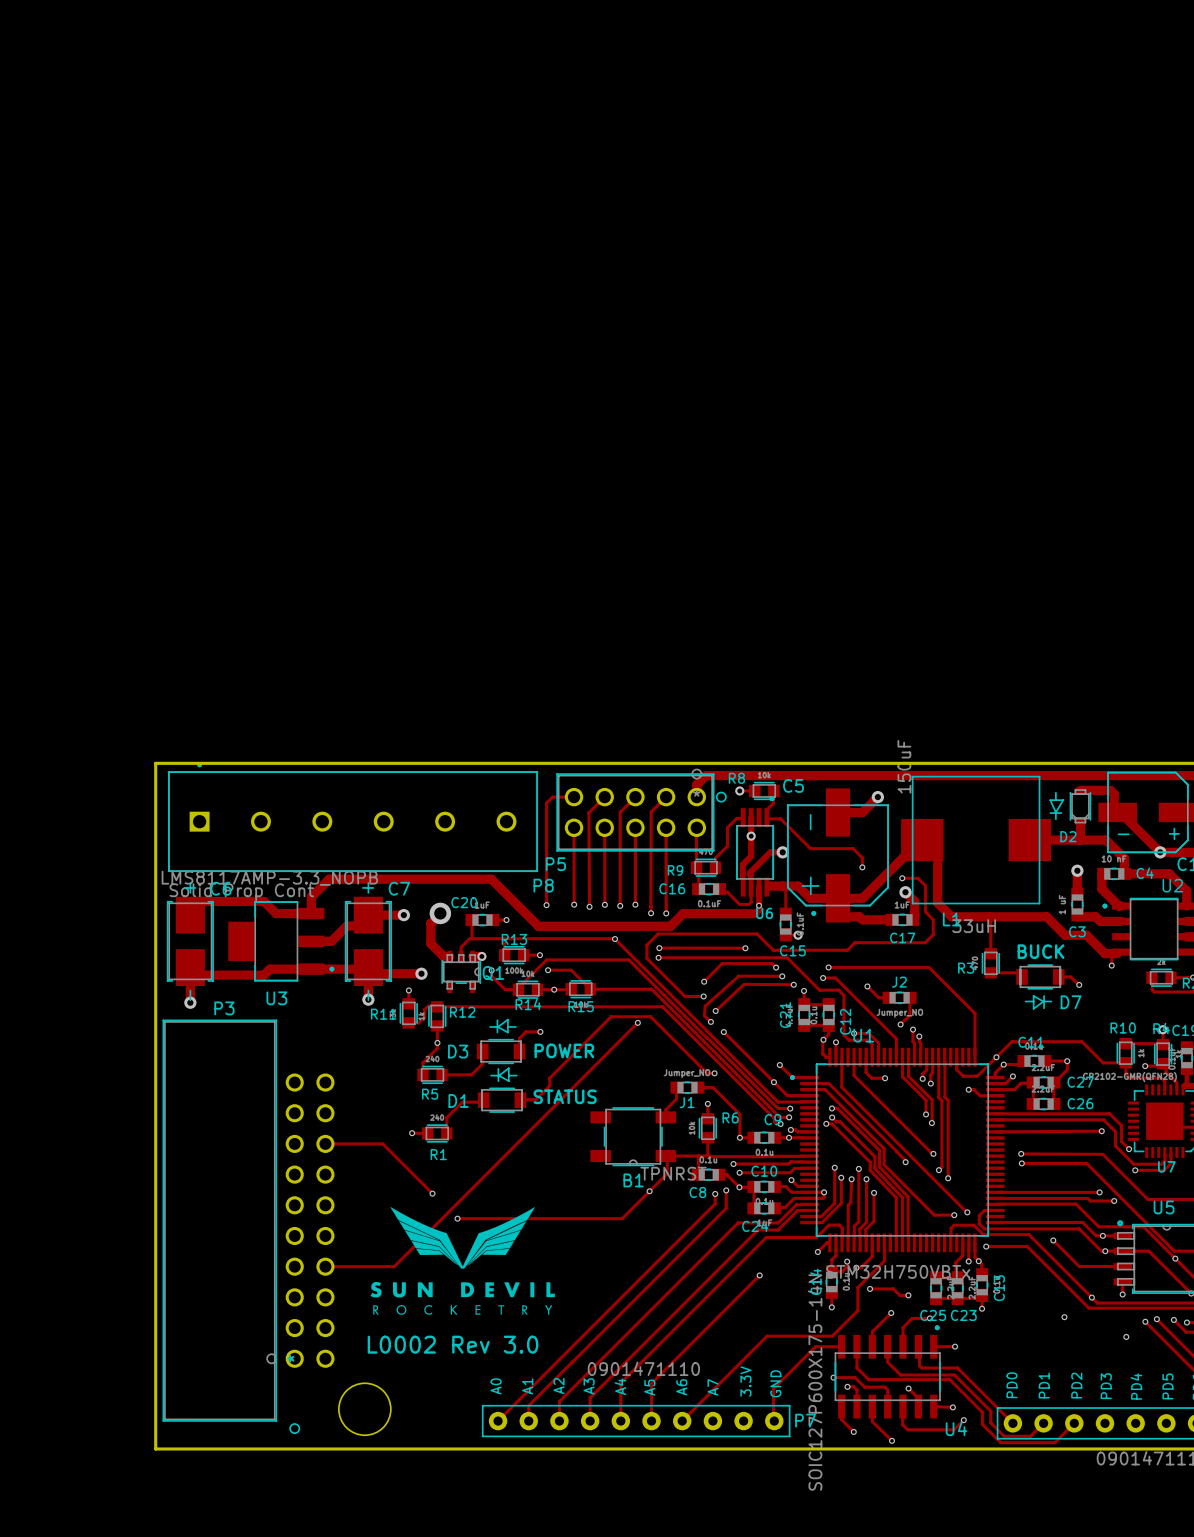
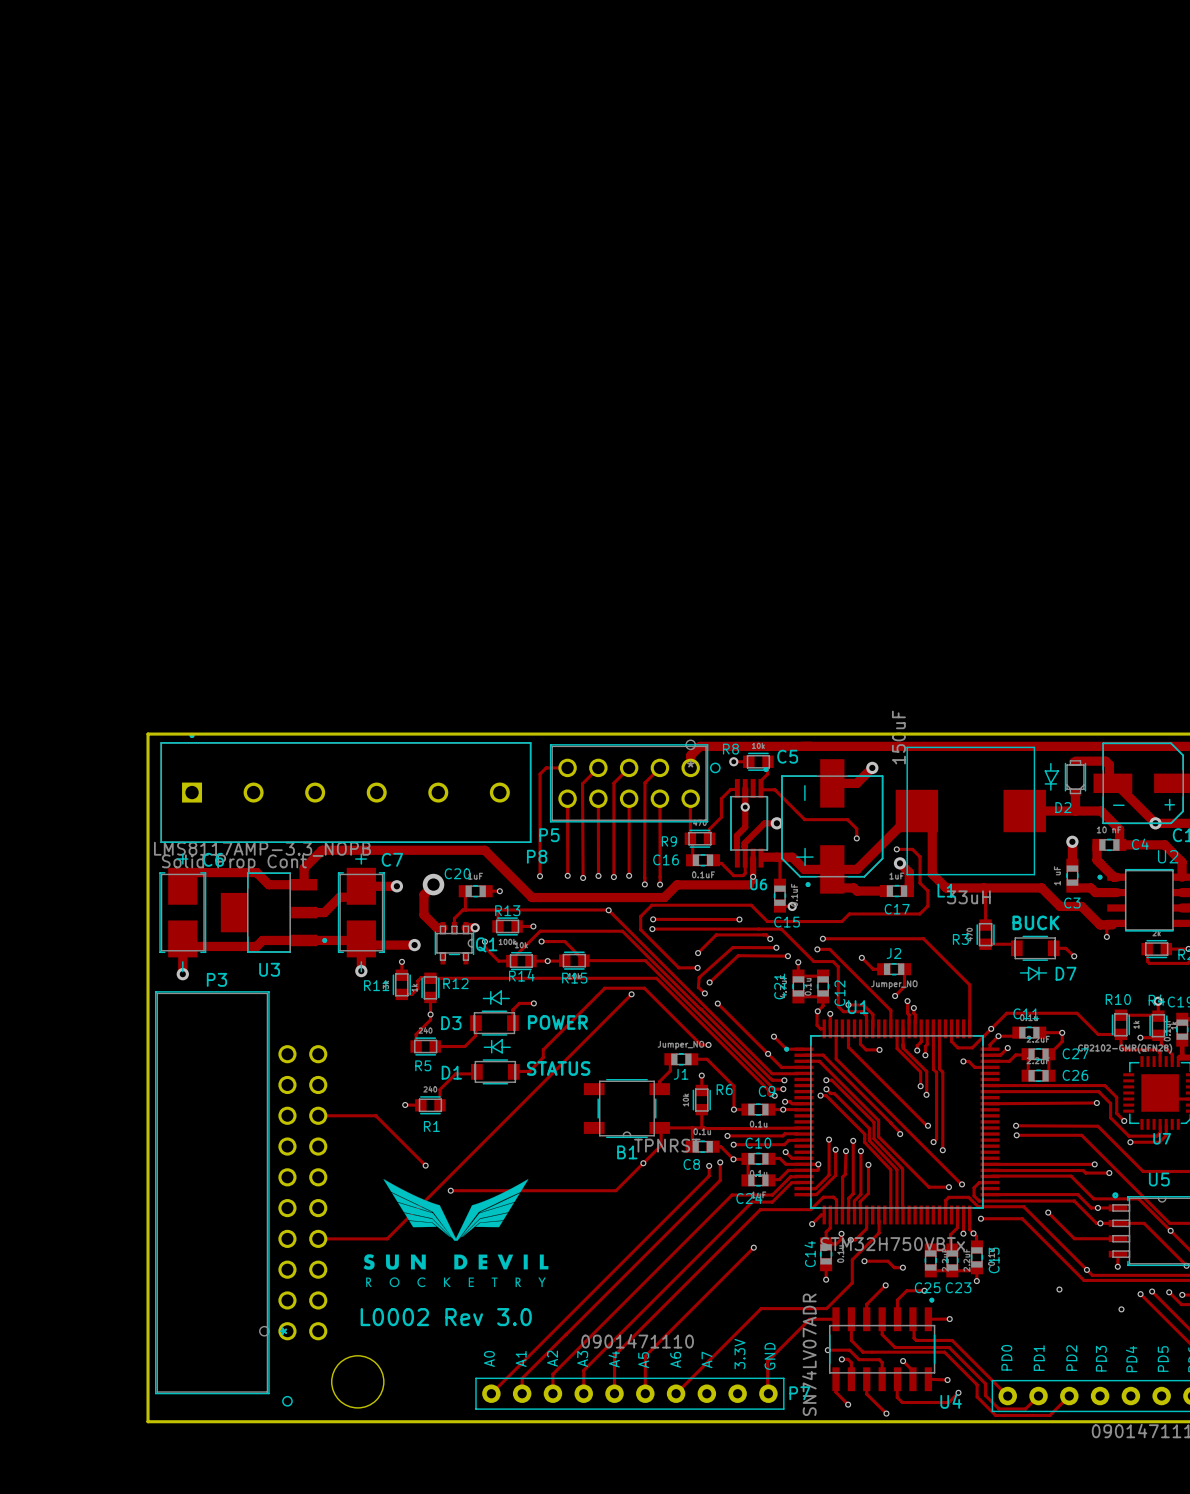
U4 value: SOIC127P600X175-14N (815, 1382) -> SN74LV07ADR (809, 1354)

